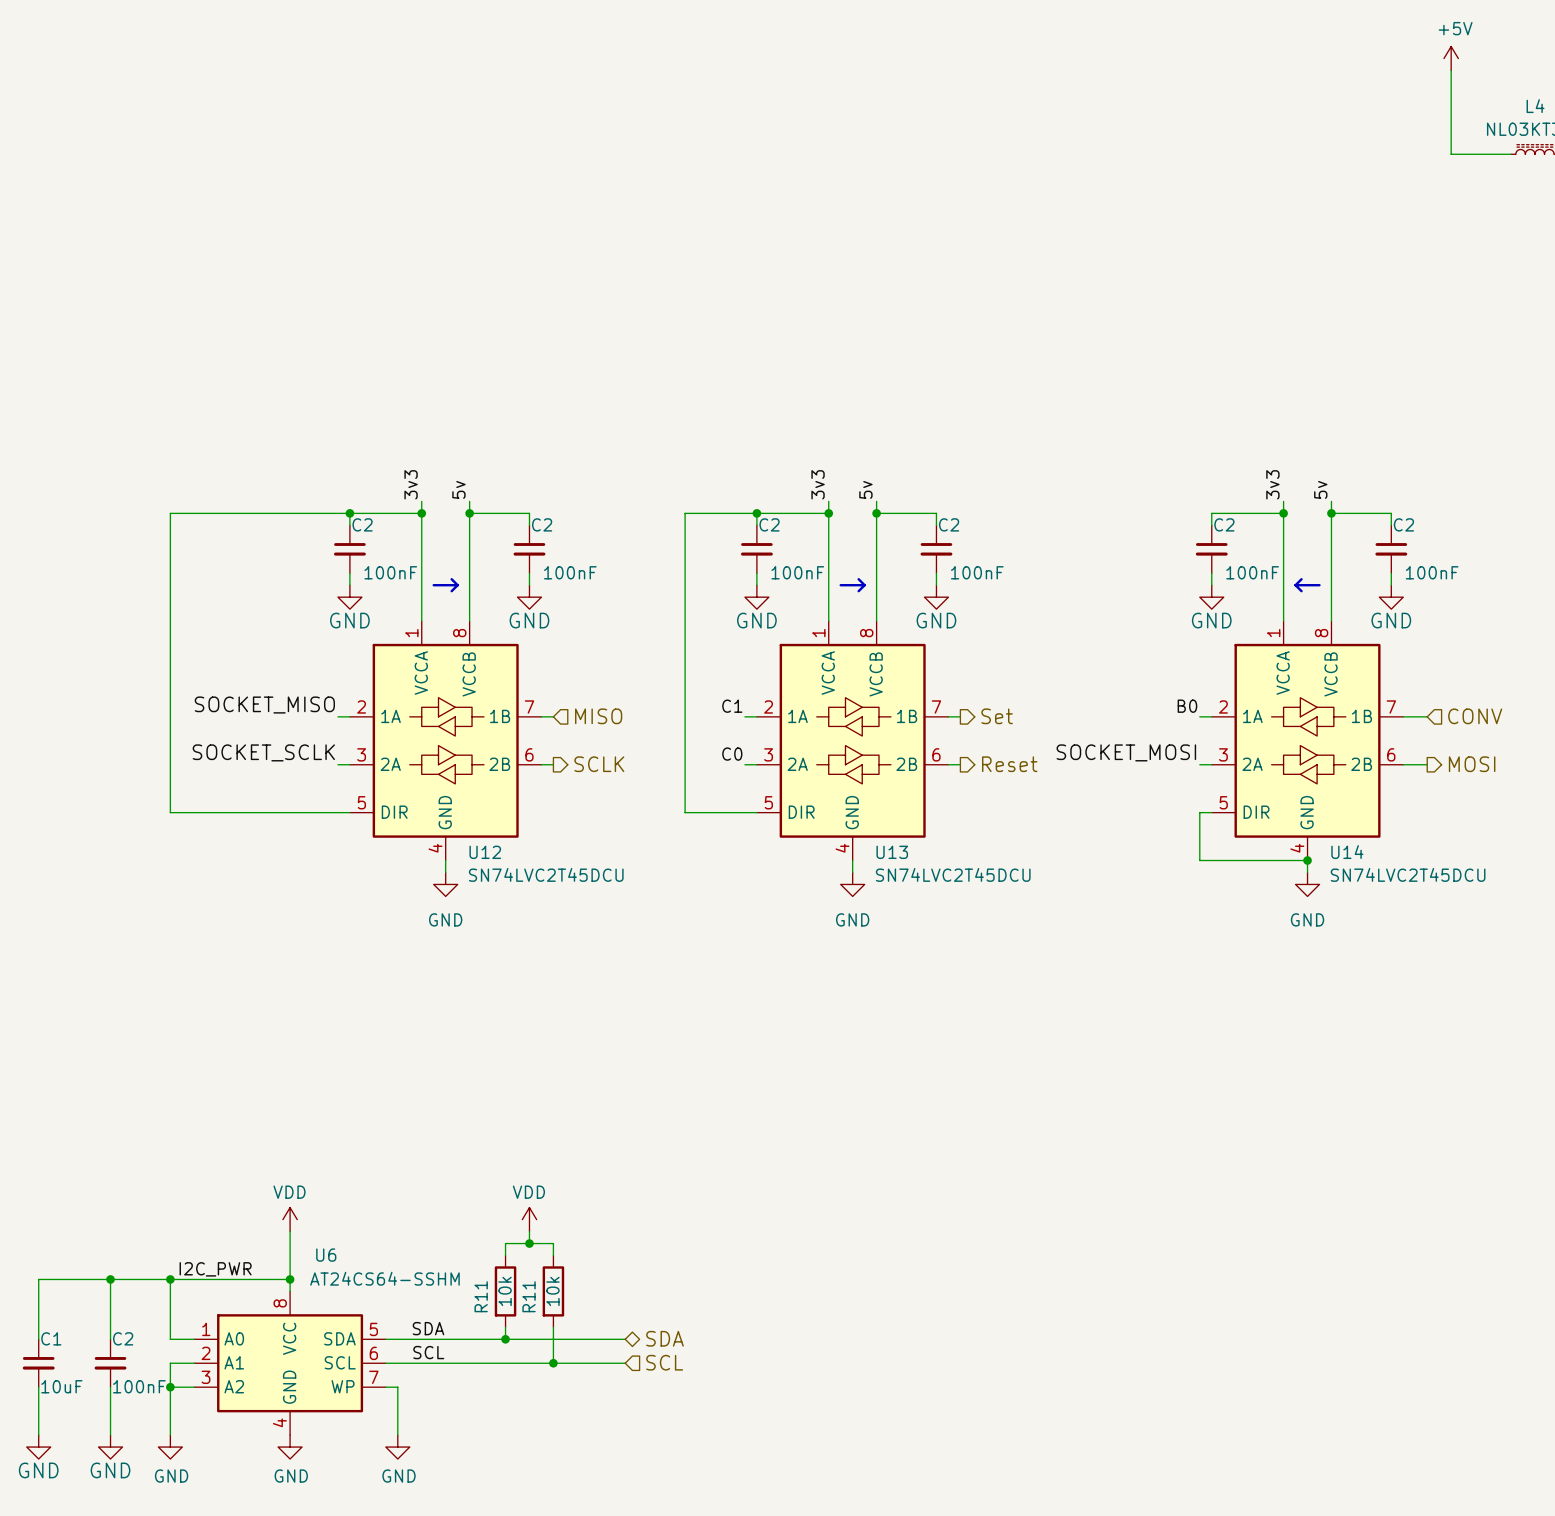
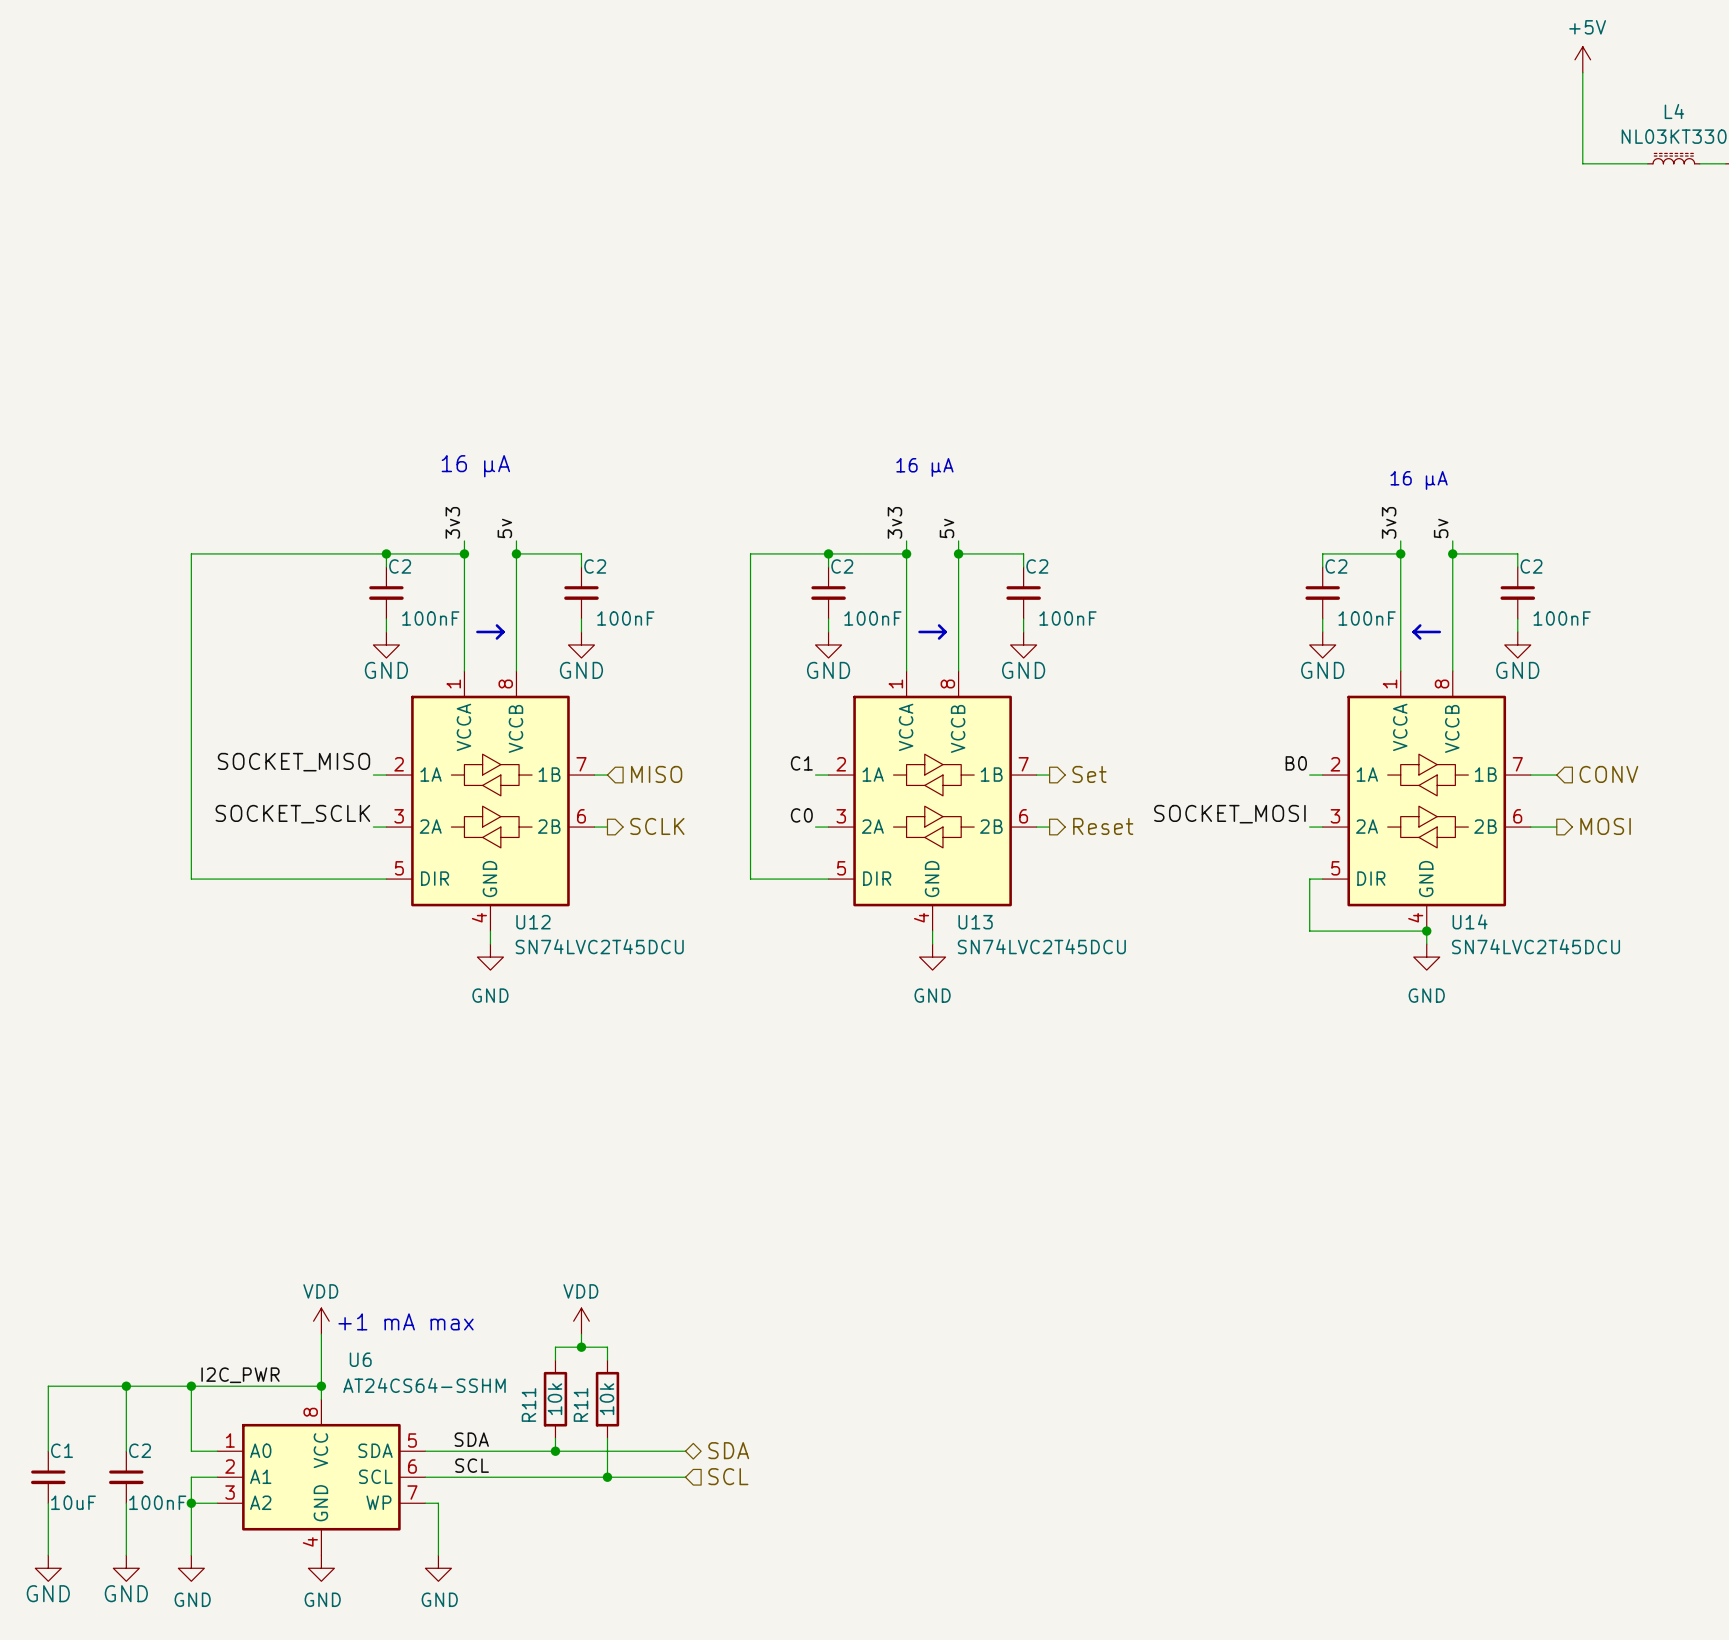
text: none -> 16 μA (475, 466)
text: none -> 16 μA (924, 467)
text: none -> 16 μA (1419, 480)
text: none -> +1 mA max (406, 1321)

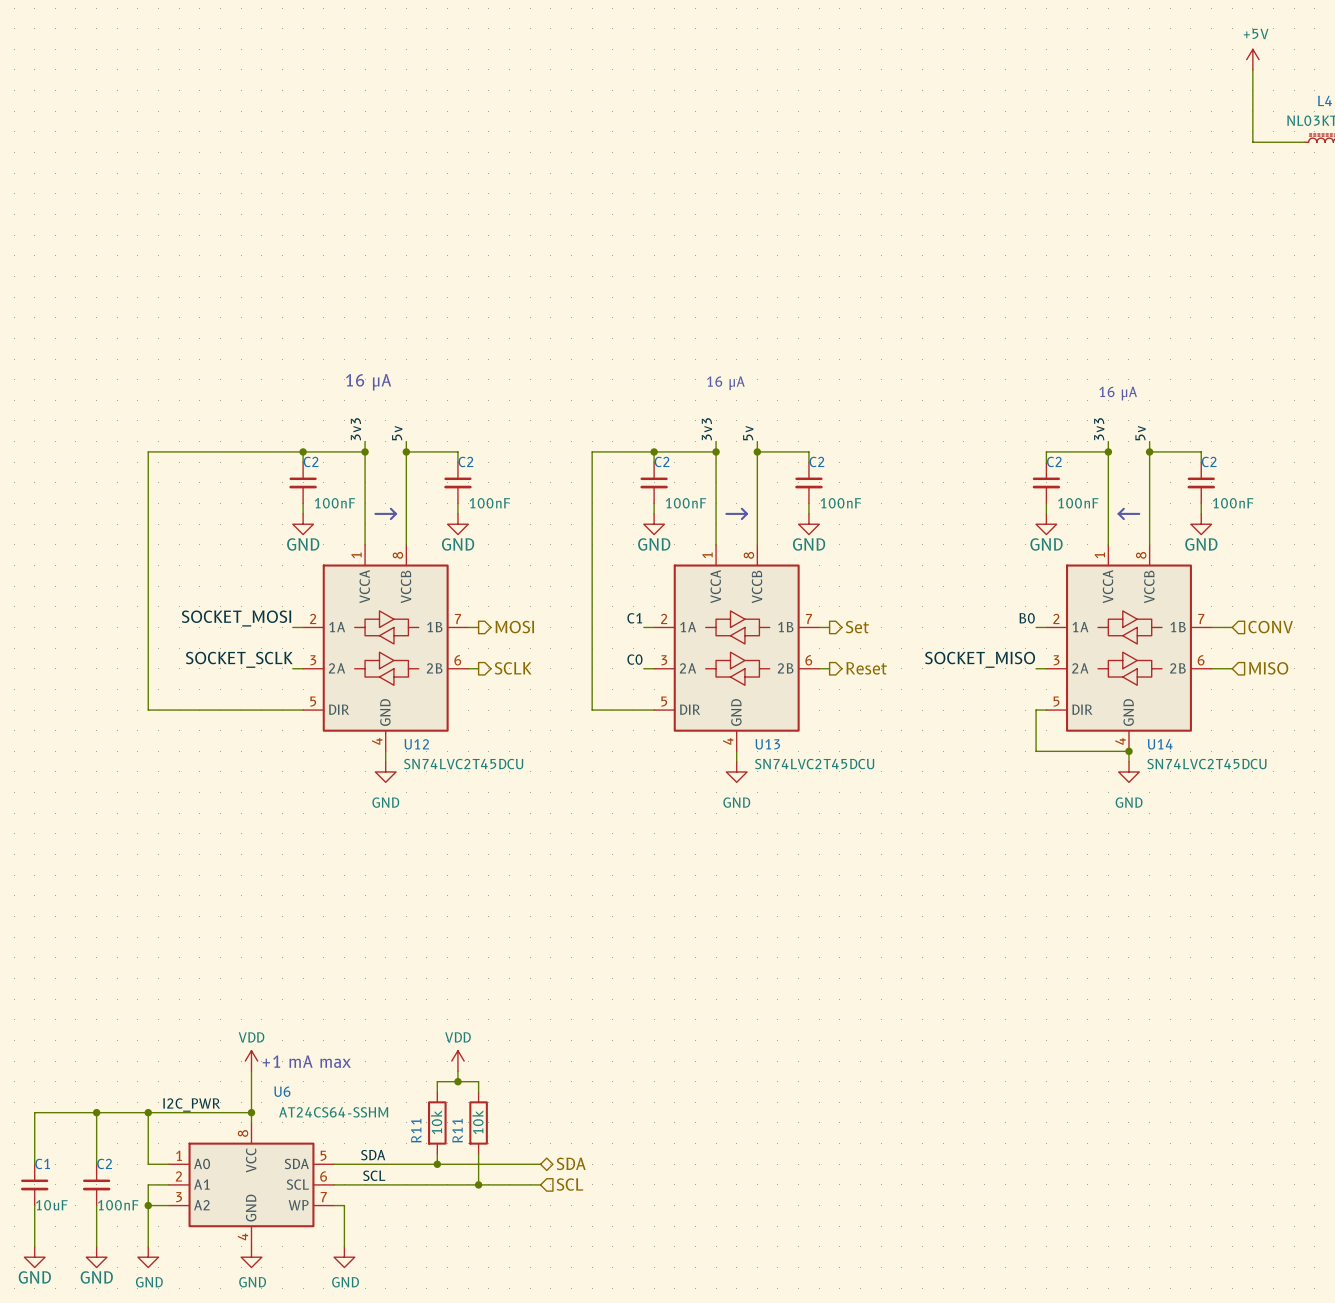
label: SOCKET_MISO (293, 762) -> SOCKET_MOSI (236, 618)
hierarchical label shape: input (656, 774) -> output (514, 627)
hierarchical label: MISO (656, 774) -> MOSI (514, 627)
label: SOCKET_MOSI (1229, 814) -> SOCKET_MISO (980, 659)
hierarchical label shape: output (1605, 826) -> input (1268, 668)
hierarchical label: MOSI (1605, 826) -> MISO (1268, 668)

